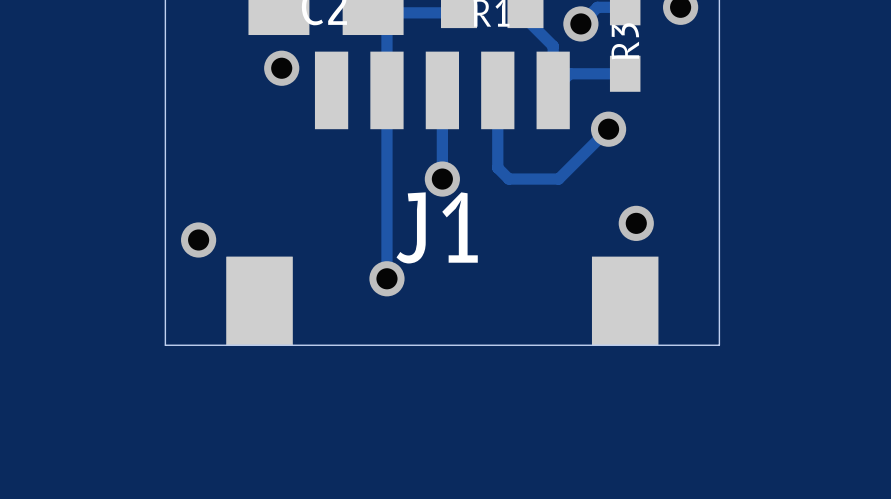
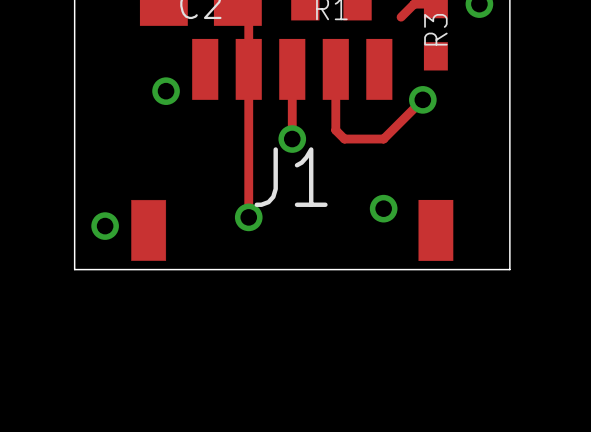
track: (378, 12) (458, 12) -> none
track: (525, 12) (525, 18) (553, 46) (553, 90) (569, 73) (625, 73) -> none
via: (580, 23) -> none
J1 footprint: [226, 51, 659, 346] -> [131, 38, 454, 261]
via position: (281, 68) -> (166, 91)
via position: (636, 223) -> (383, 208)
via position: (198, 240) -> (105, 226)

